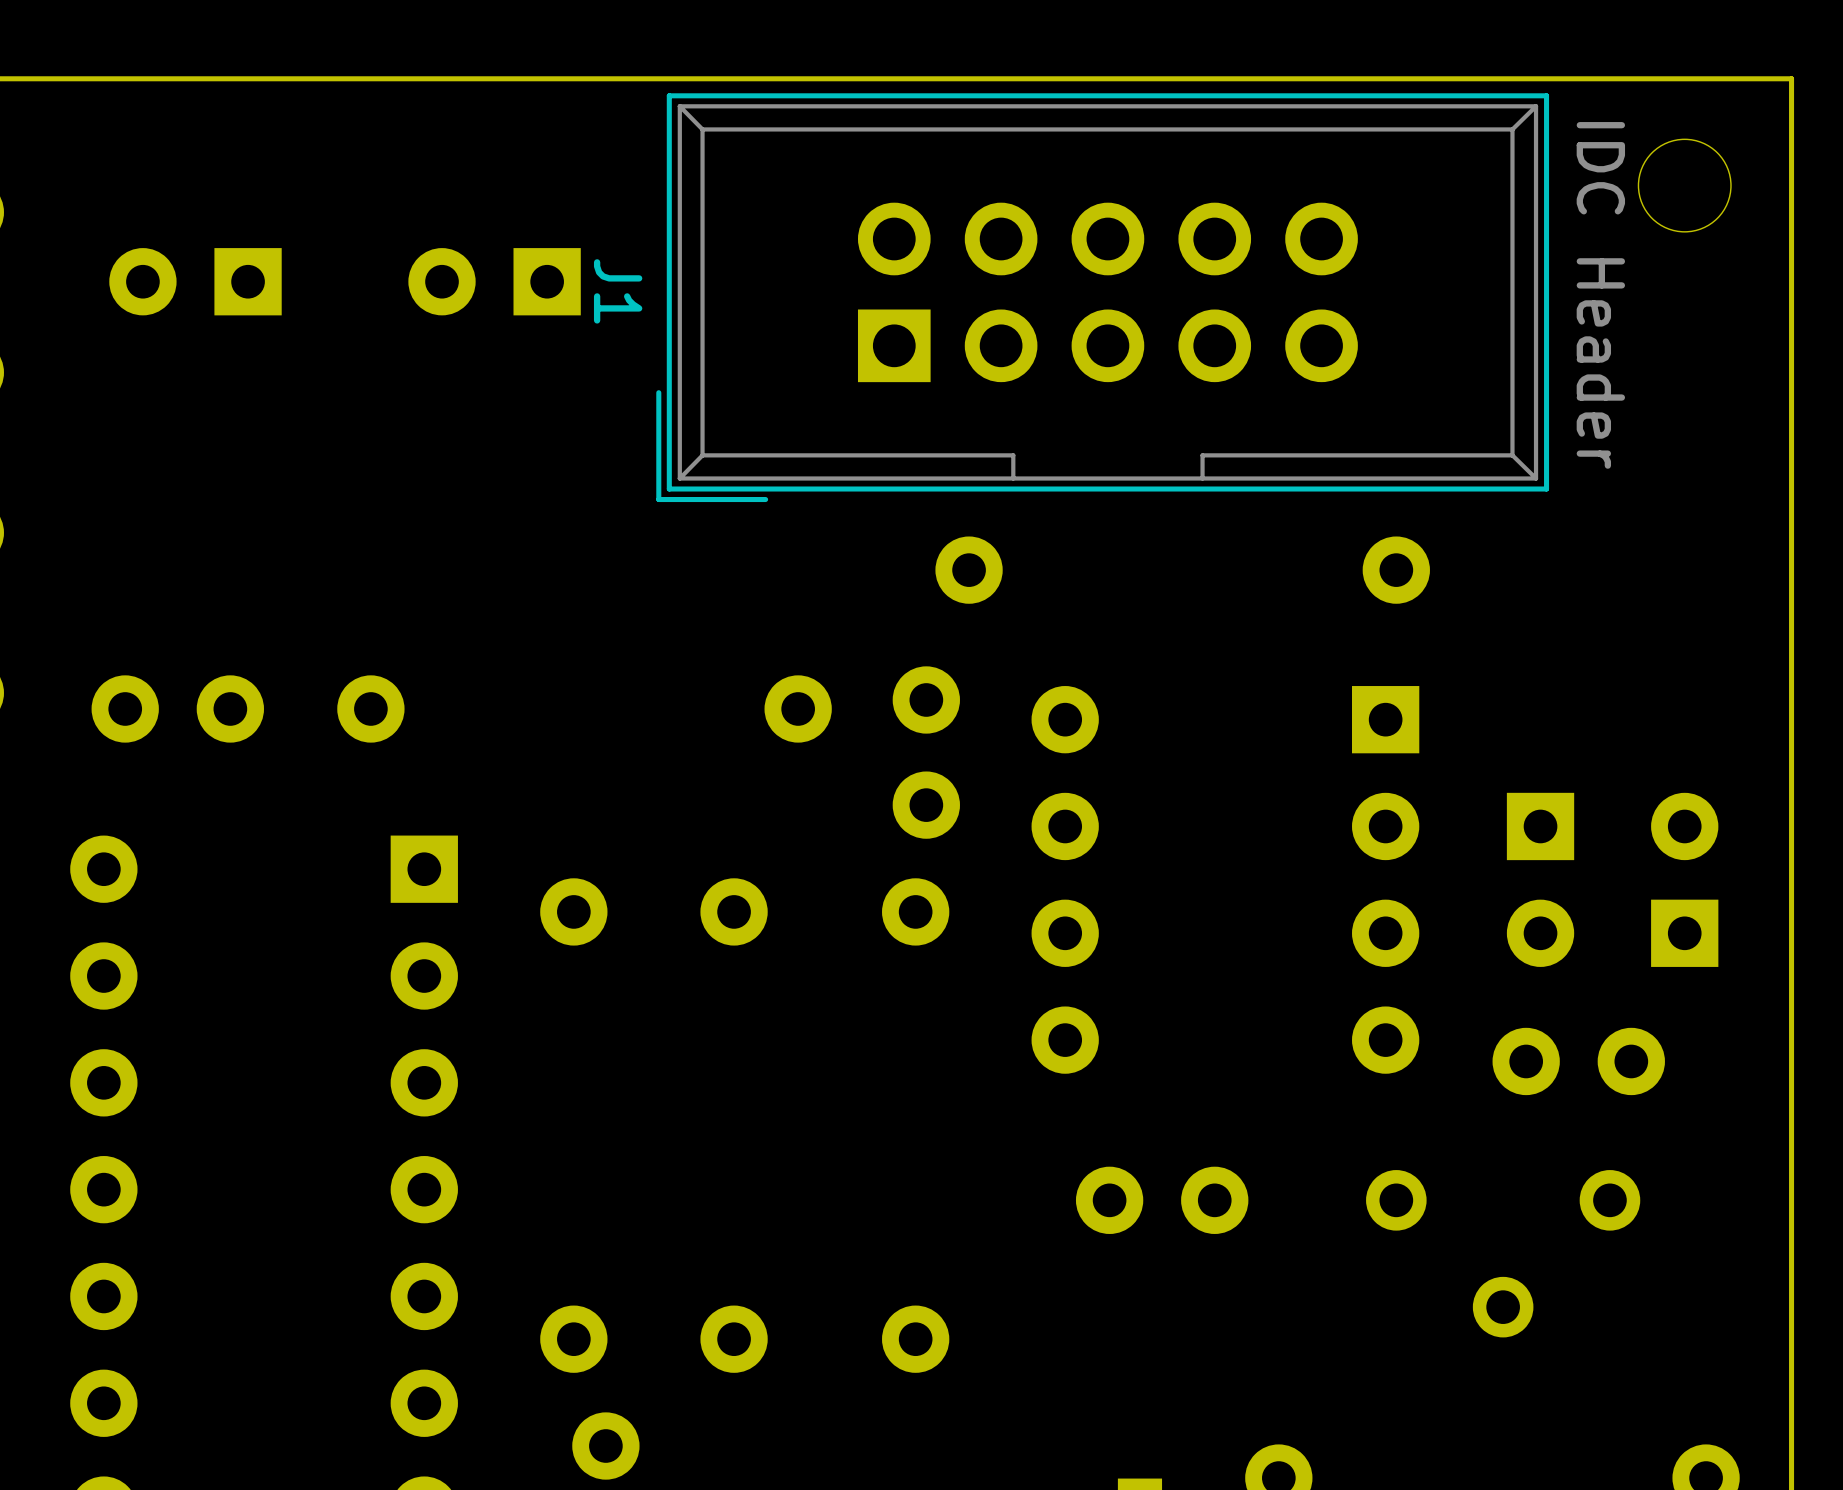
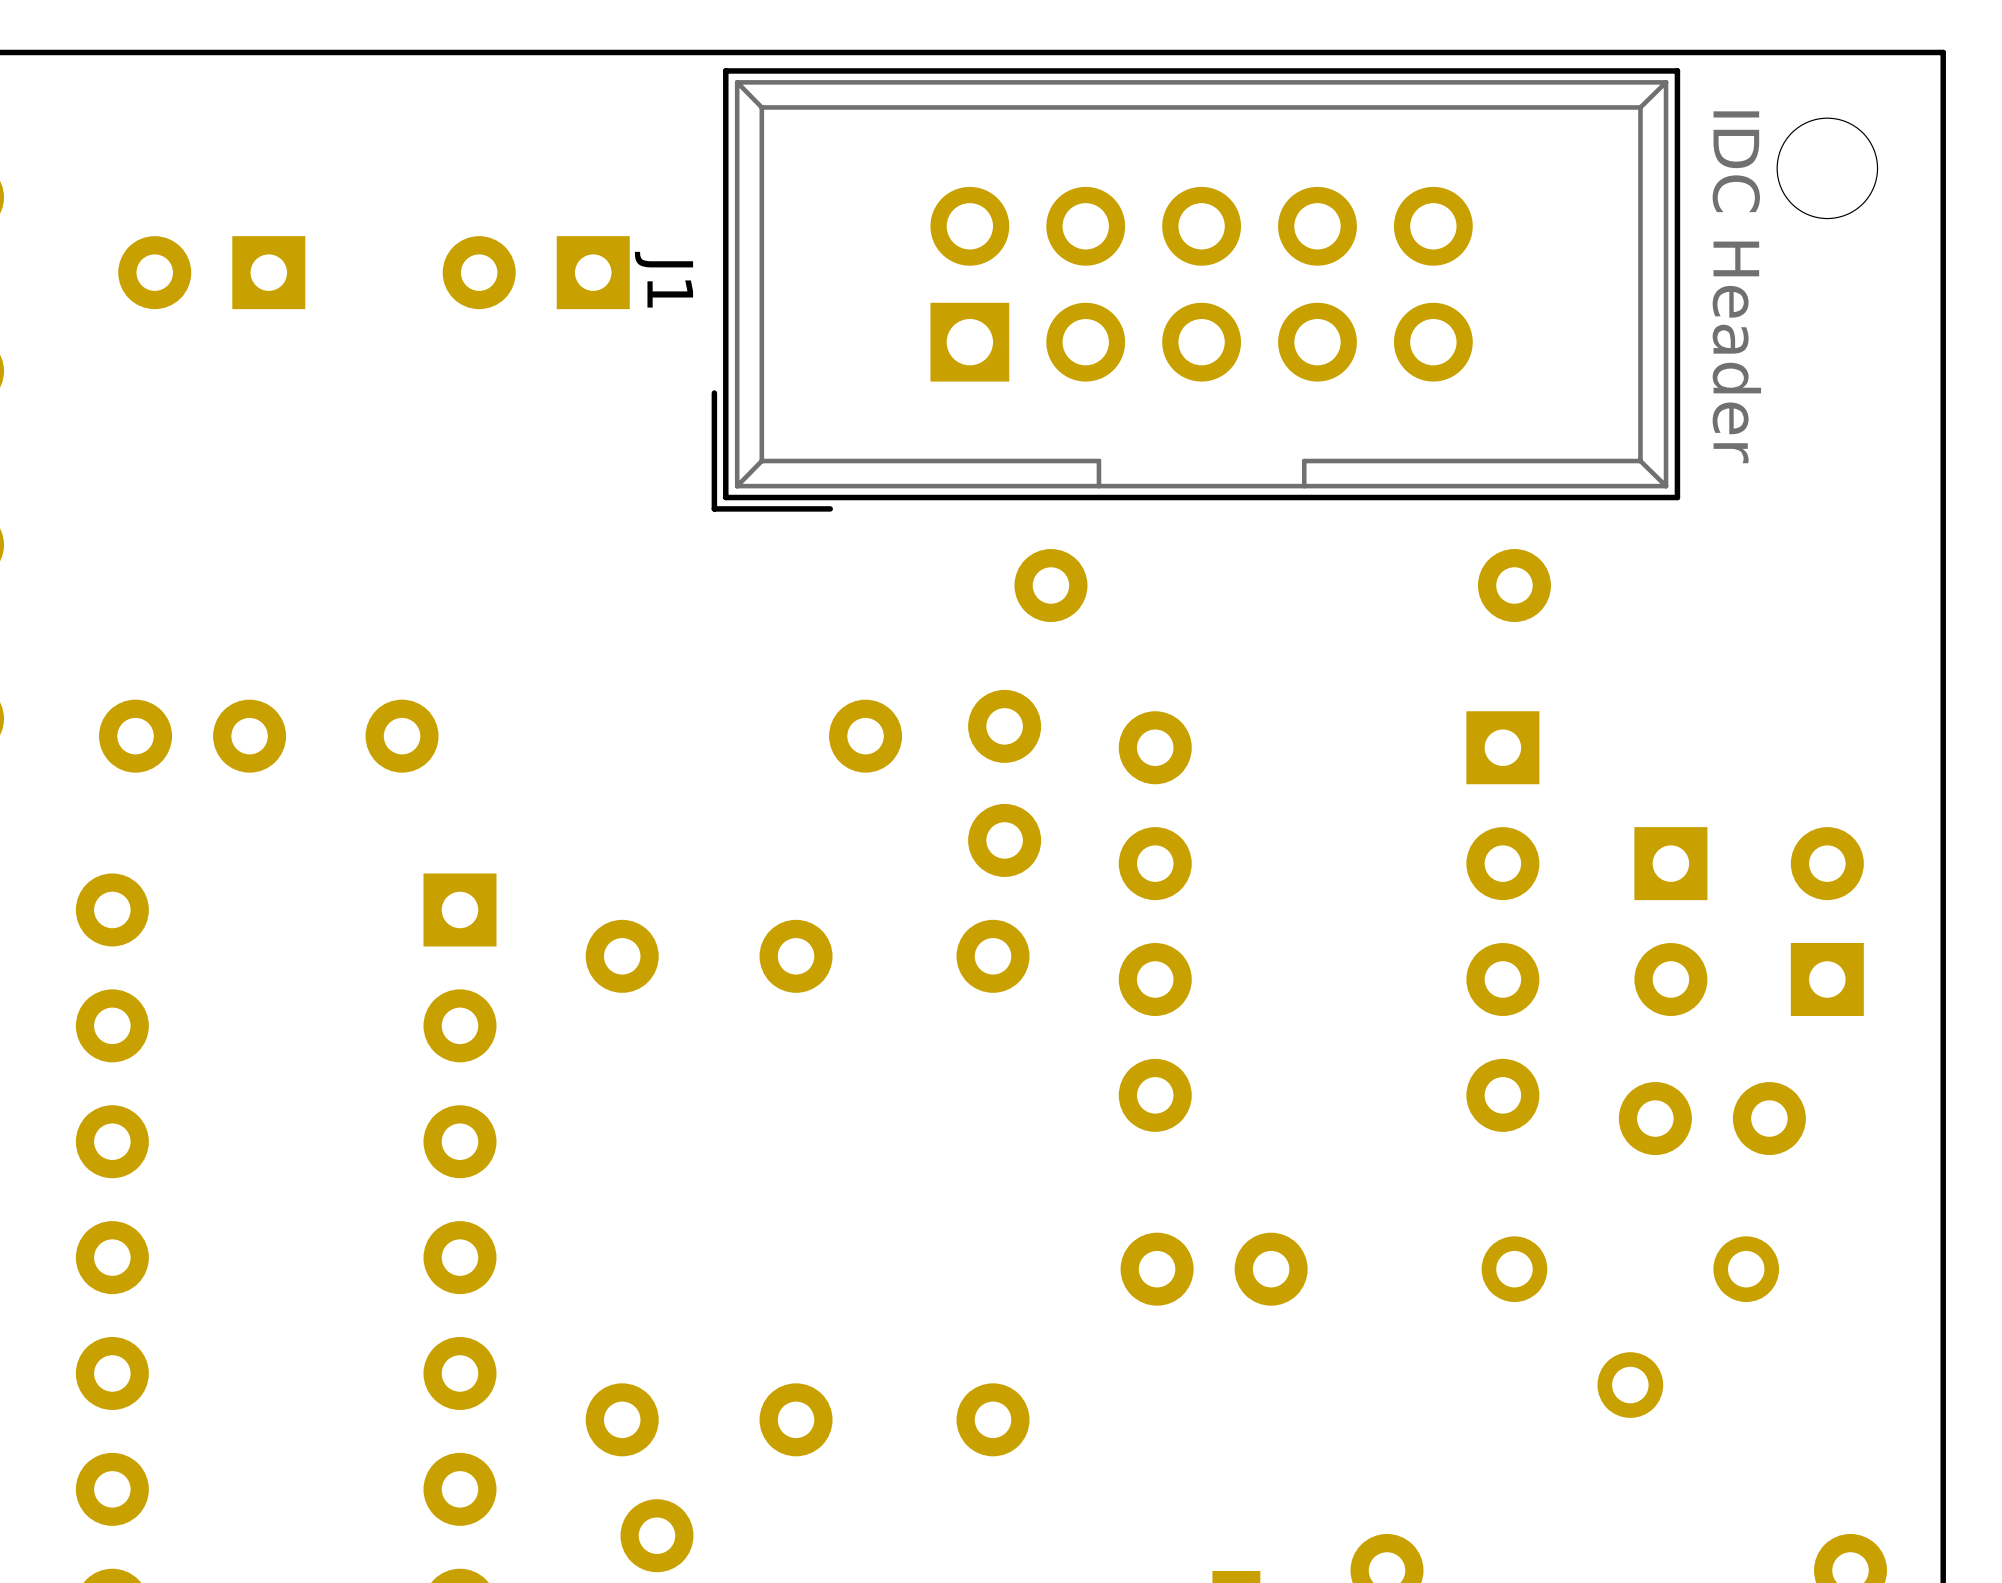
part position: (1162, 1200) -> (1214, 1269)

